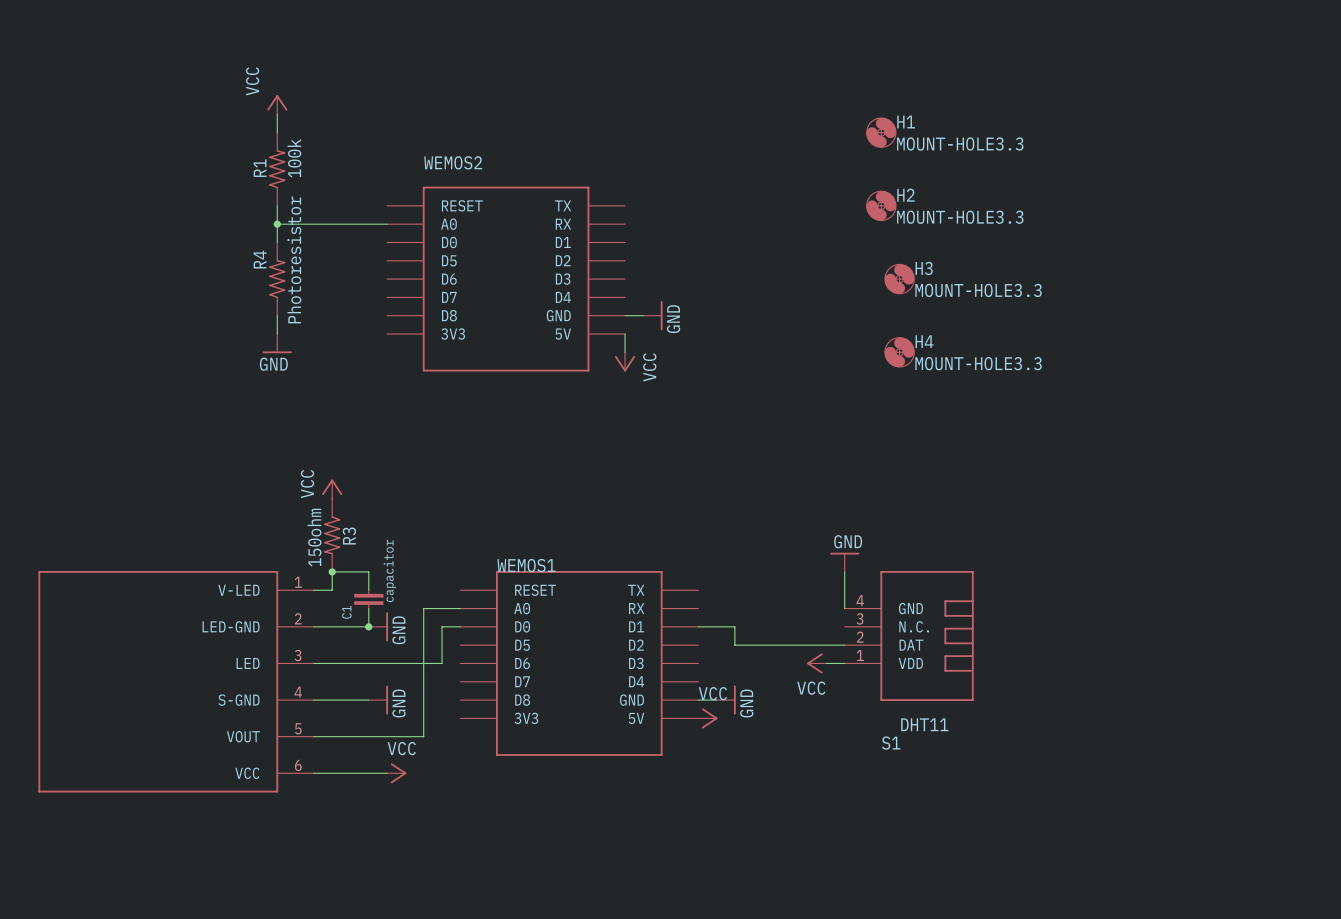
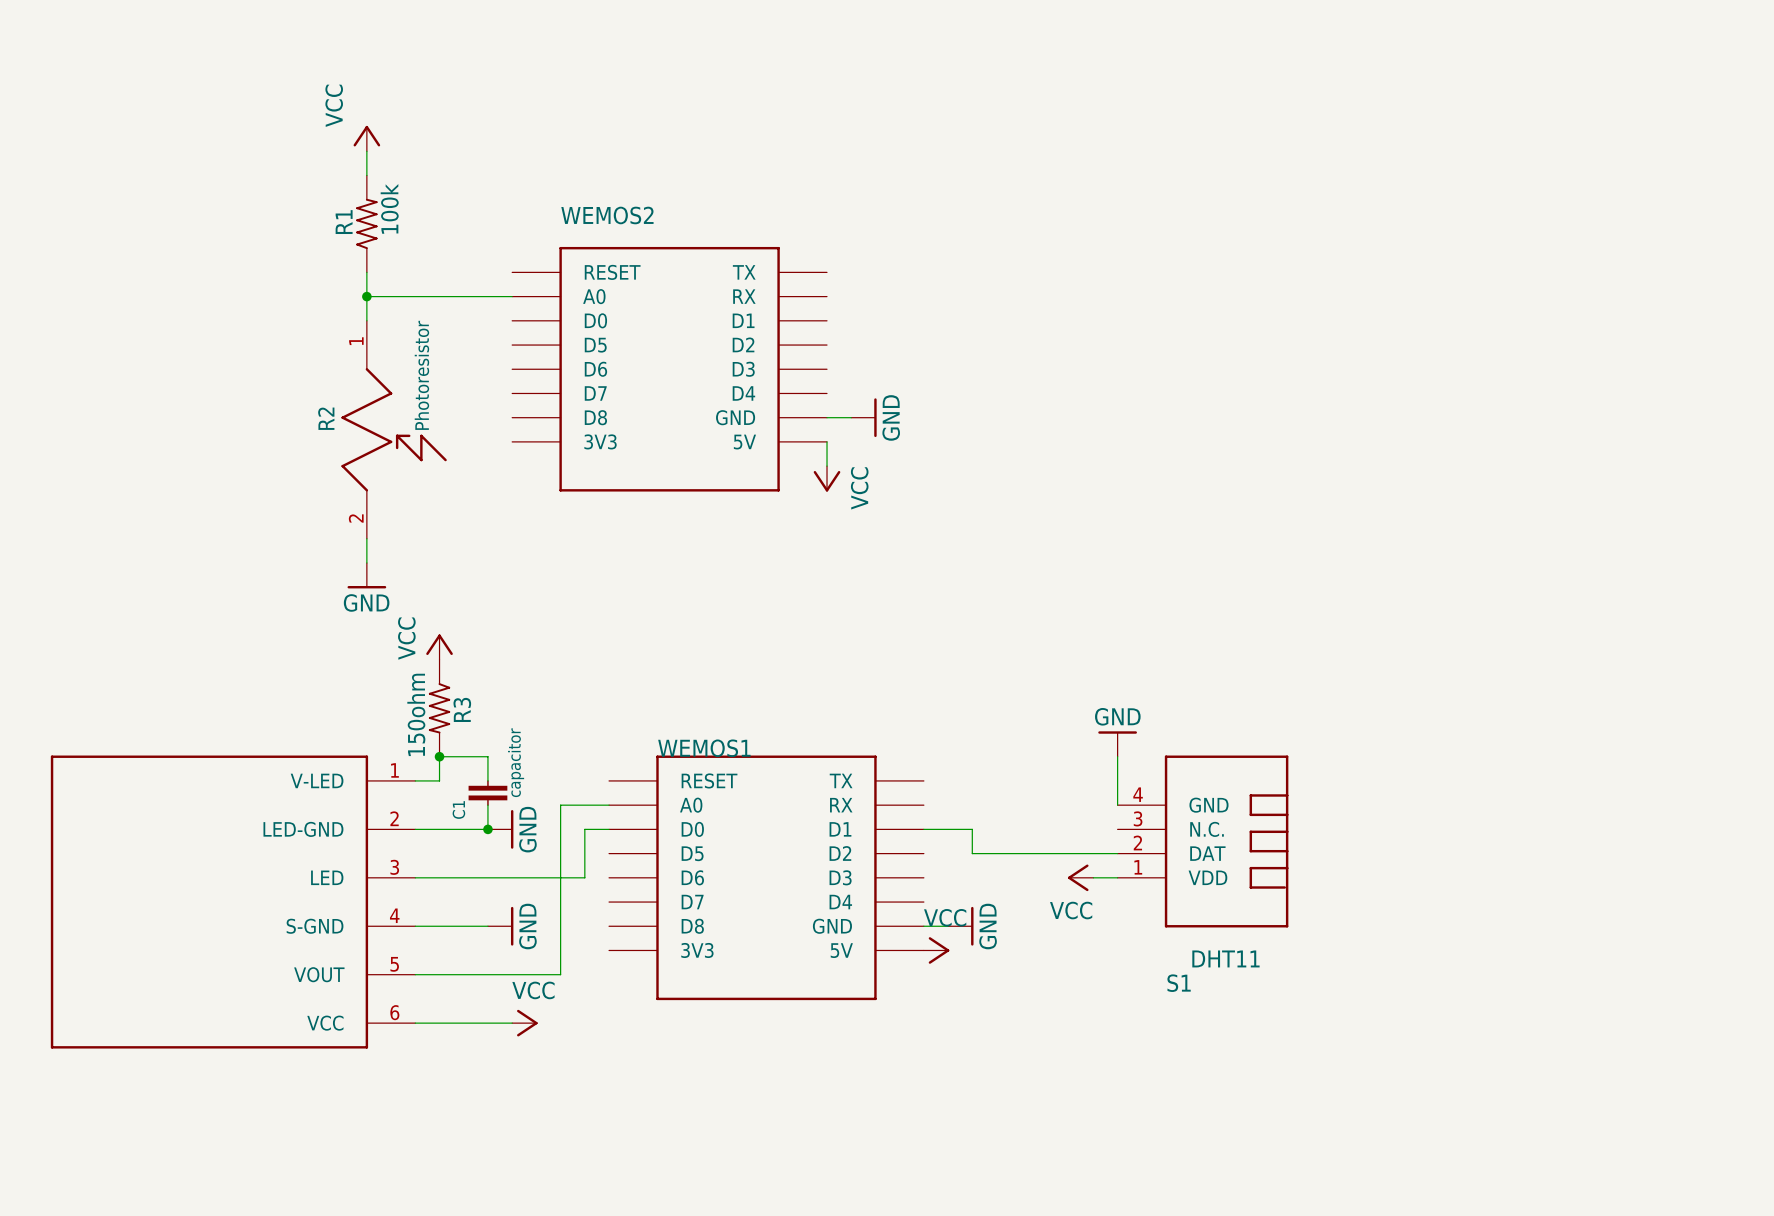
H1: MOUNT-HOLE3.3 (881, 132) -> none
H2: MOUNT-HOLE3.3 (881, 205) -> none
R4: Photoresistor (277, 279) -> none
H3: MOUNT-HOLE3.3 (899, 279) -> none
wire: (277, 315) (277, 333) -> (366, 538) (366, 562)
R2: none -> Photoresistor (394, 429)
power symbol position: GND (277, 343) -> GND (366, 575)
H4: MOUNT-HOLE3.3 (899, 352) -> none

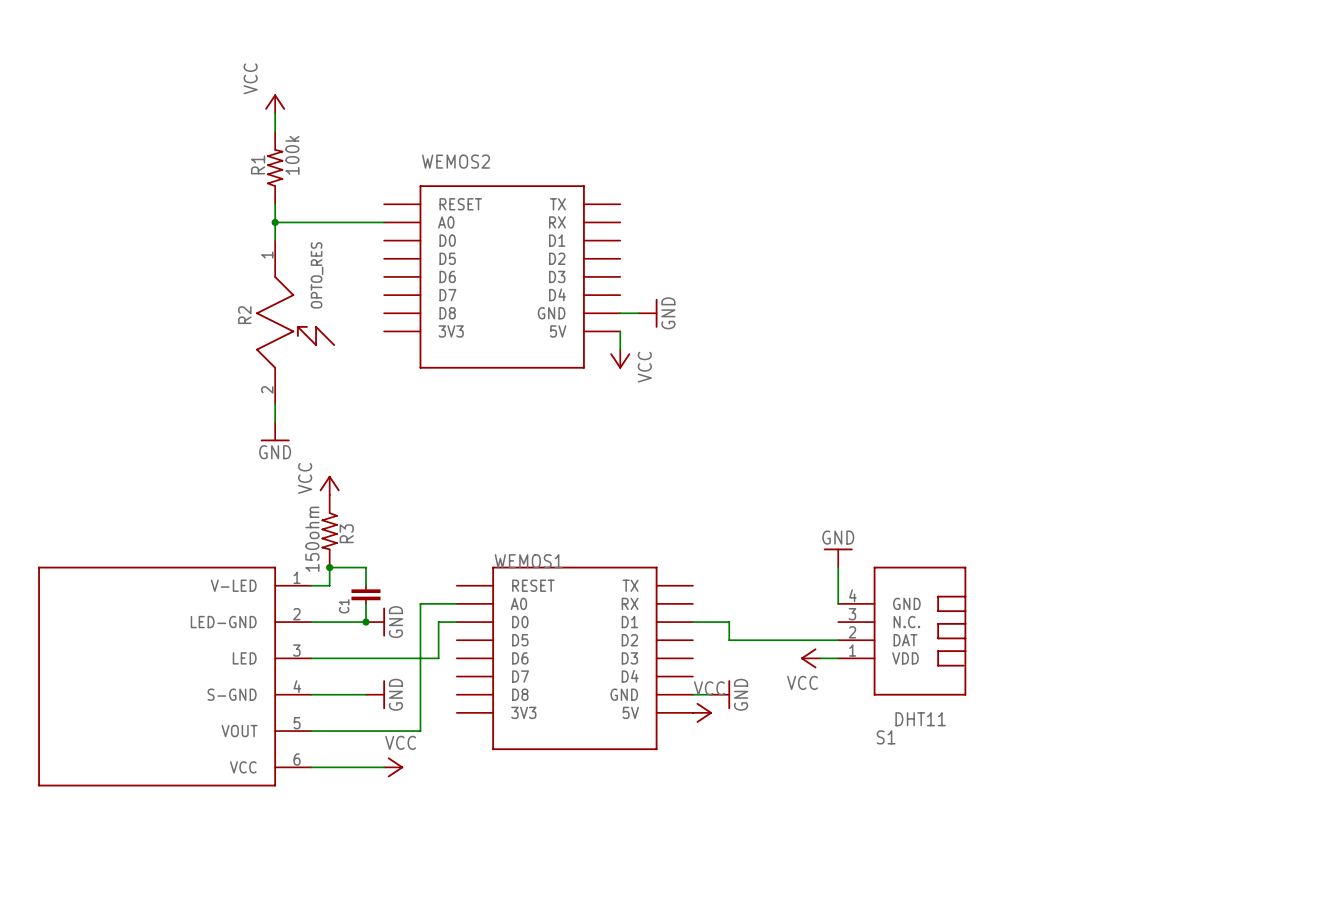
R2 value: Photoresistor (421, 375) -> OPTO_RES (317, 275)
C1 value: capacitor (516, 762) -> none

